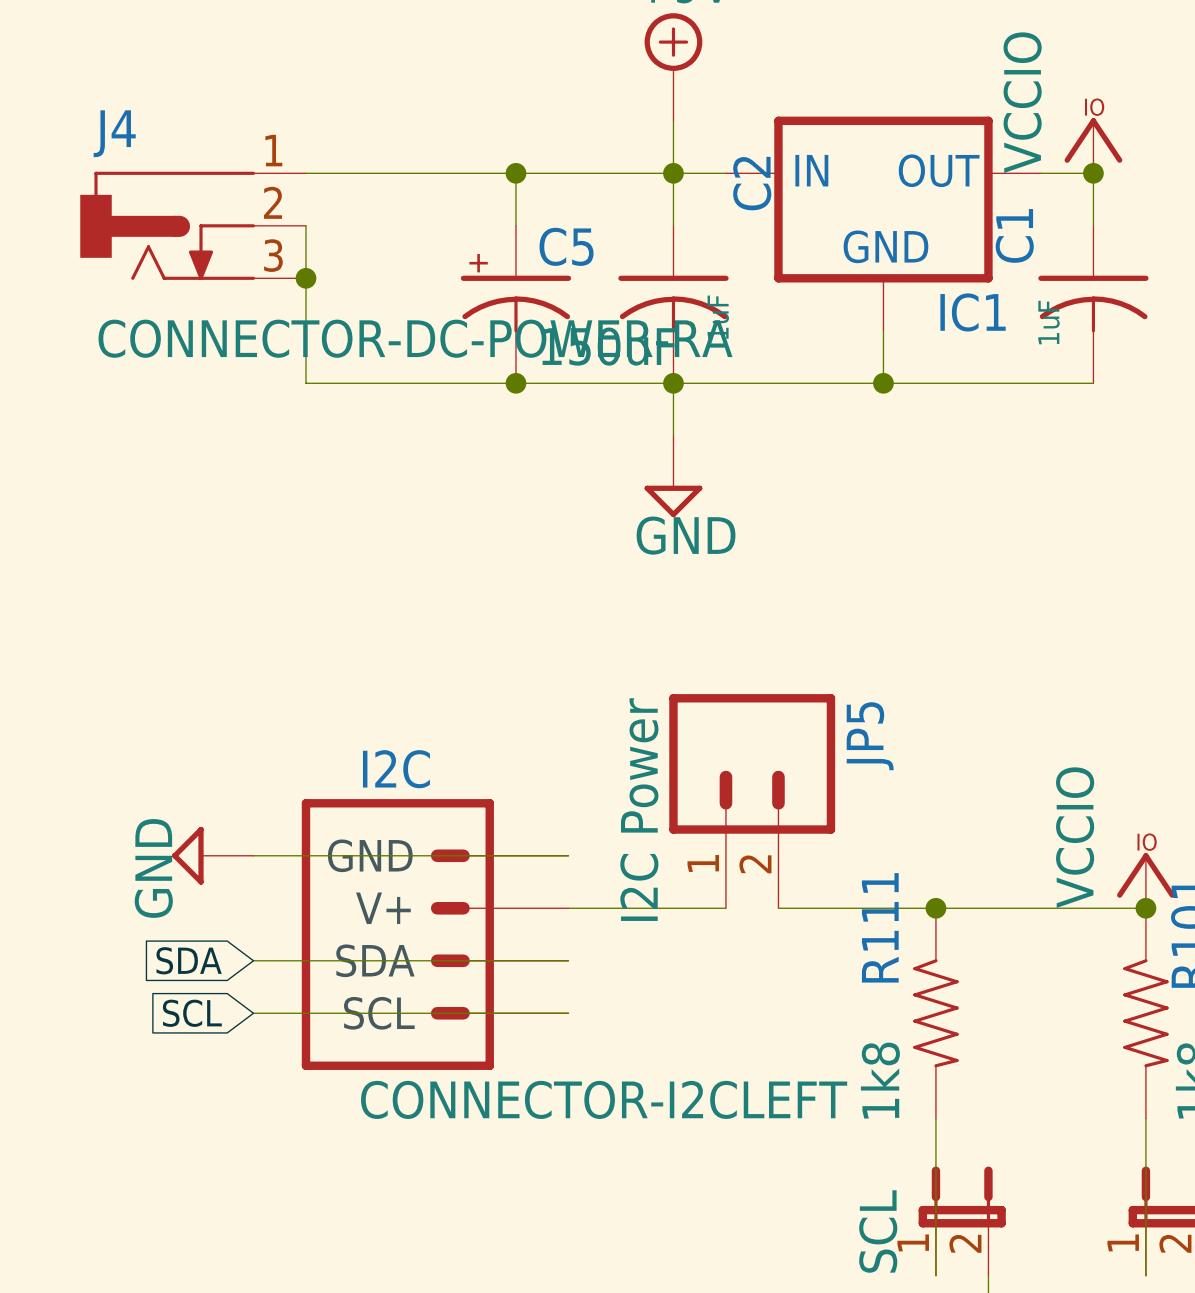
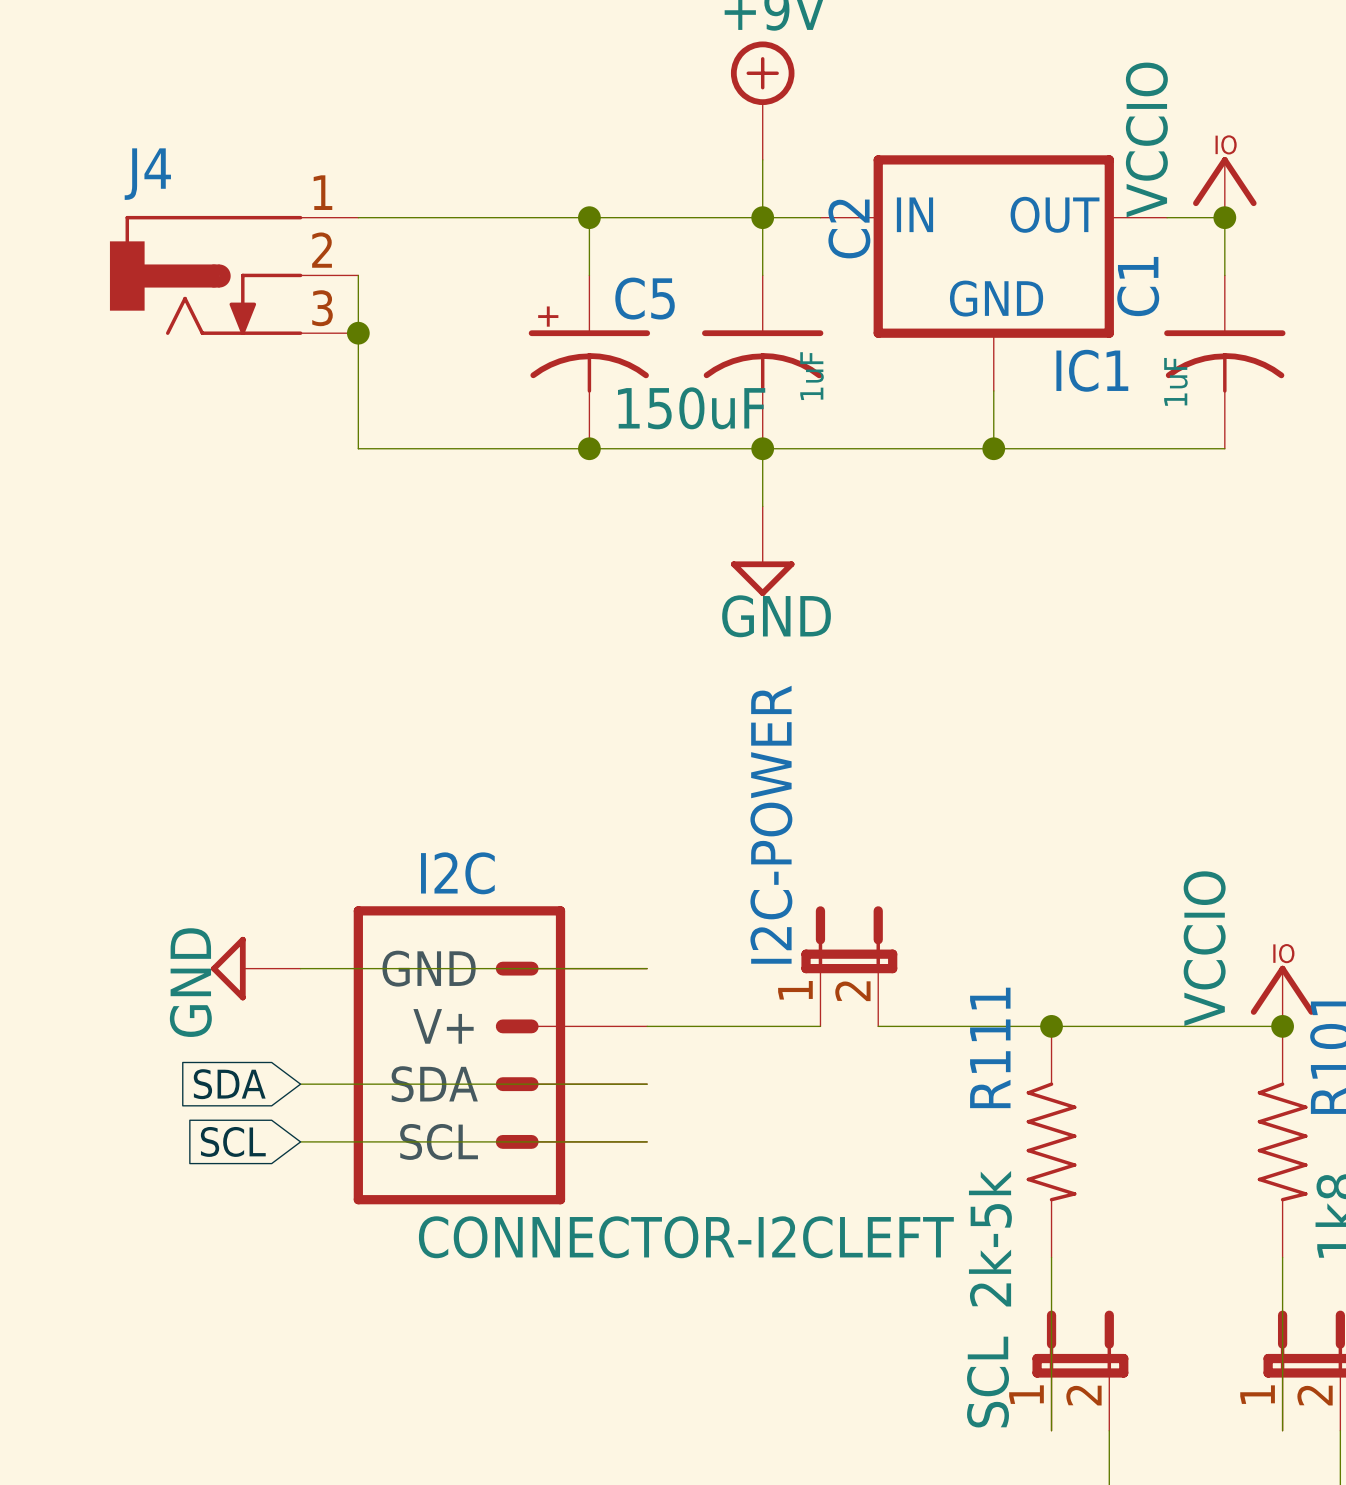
J4 value: CONNECTOR-DC-POWER-RA (415, 338) -> none
JP5: I2C Power (752, 801) -> none
I2C-POWER: none -> (849, 966)
R111 value: 1k8 (880, 1080) -> 2k-5k (990, 1238)

